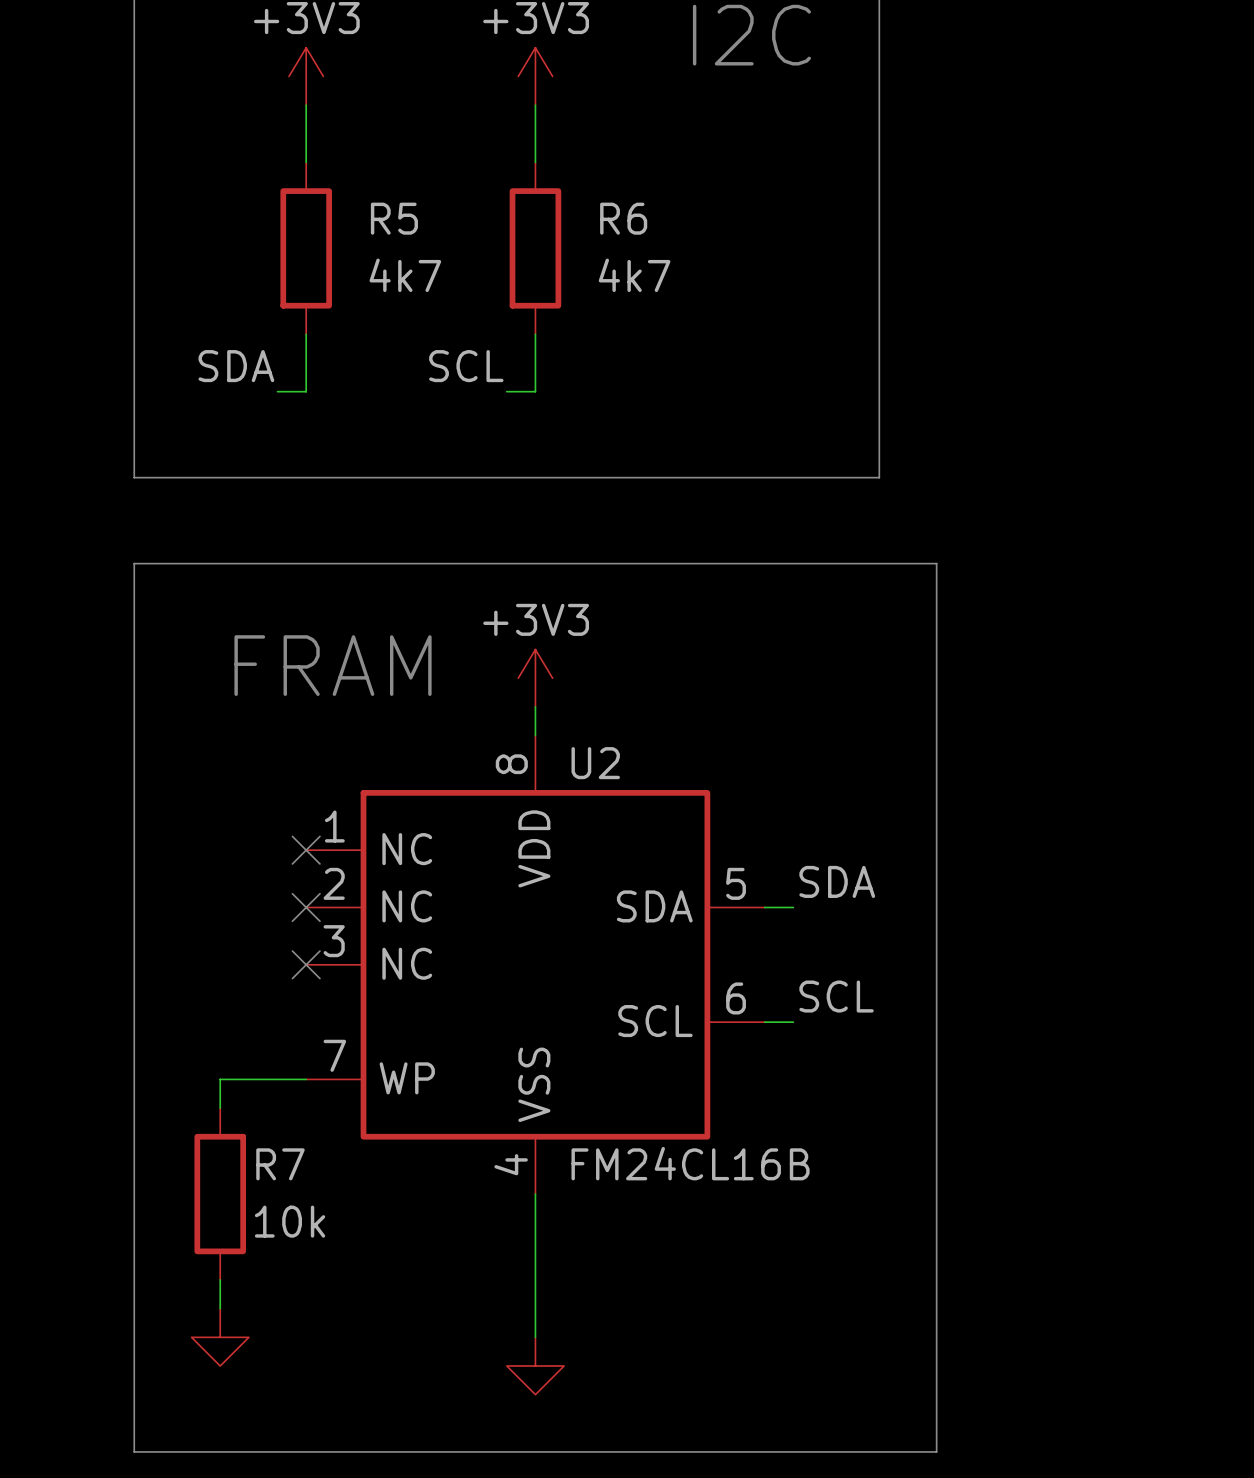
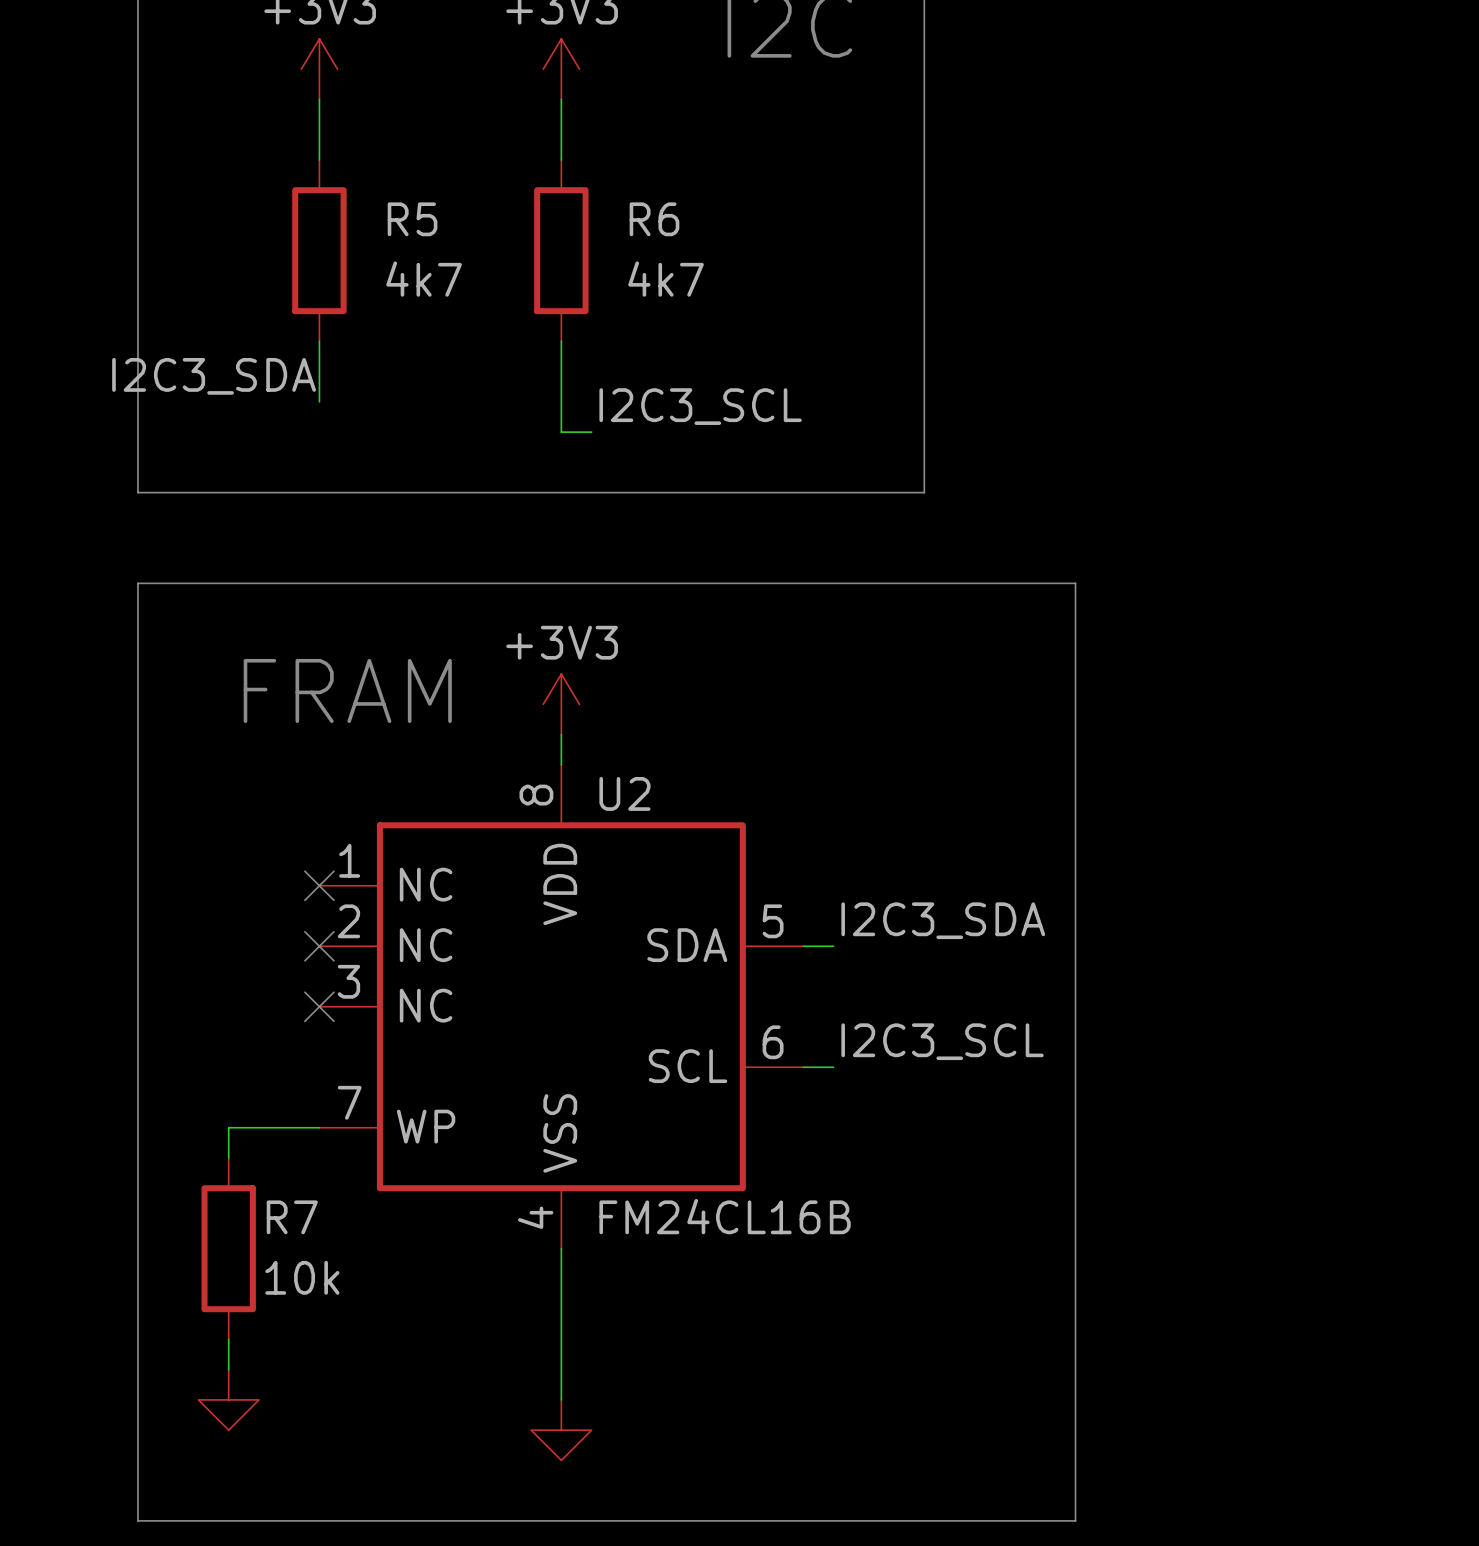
label: SDA (236, 366) -> none
label: SCL (466, 366) -> none
label: none -> I2C3_SDA (214, 376)
wire: (277, 391) (306, 391) -> none
wire: (506, 391) (535, 391) -> (591, 432) (561, 432) (561, 401)
label: none -> I2C3_SCL (700, 406)
line: (936, 563) (936, 1451) -> (984, 583) (1075, 583) (1075, 1520) (984, 1520)
label: SDA (837, 881) -> I2C3_SDA (943, 920)
label: SCL (836, 996) -> I2C3_SCL (942, 1041)

